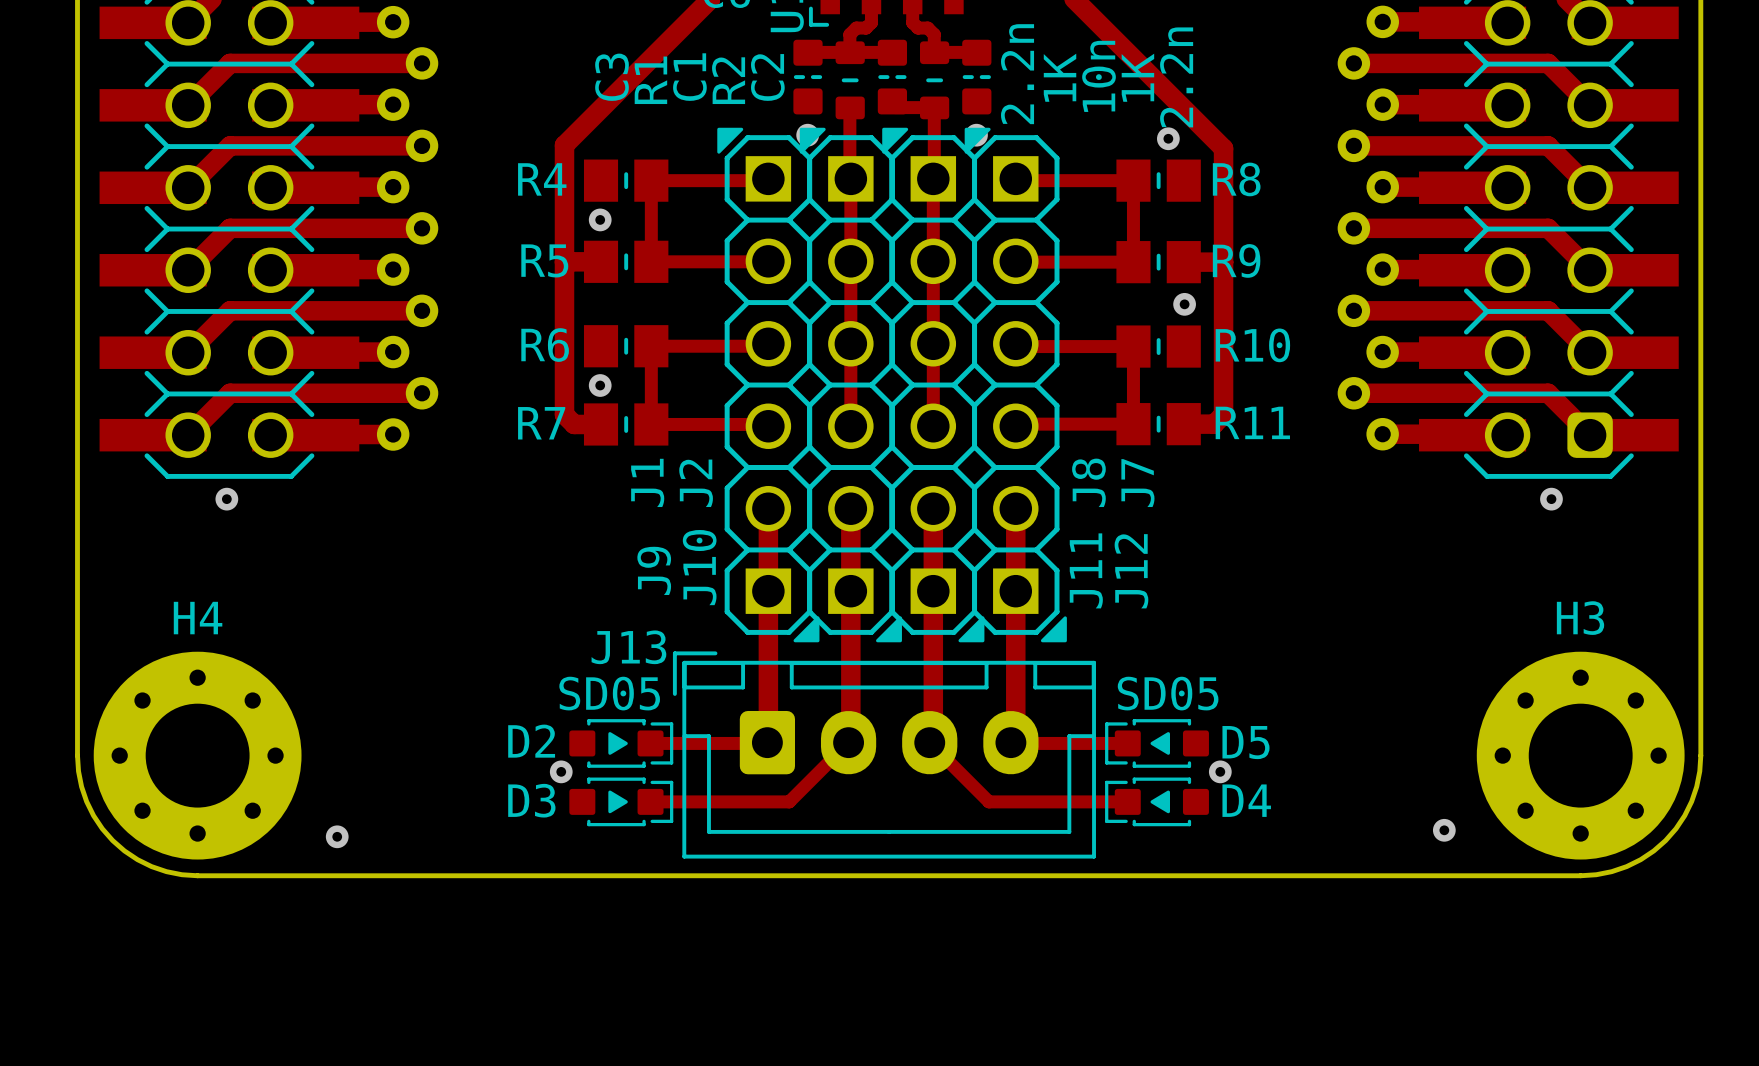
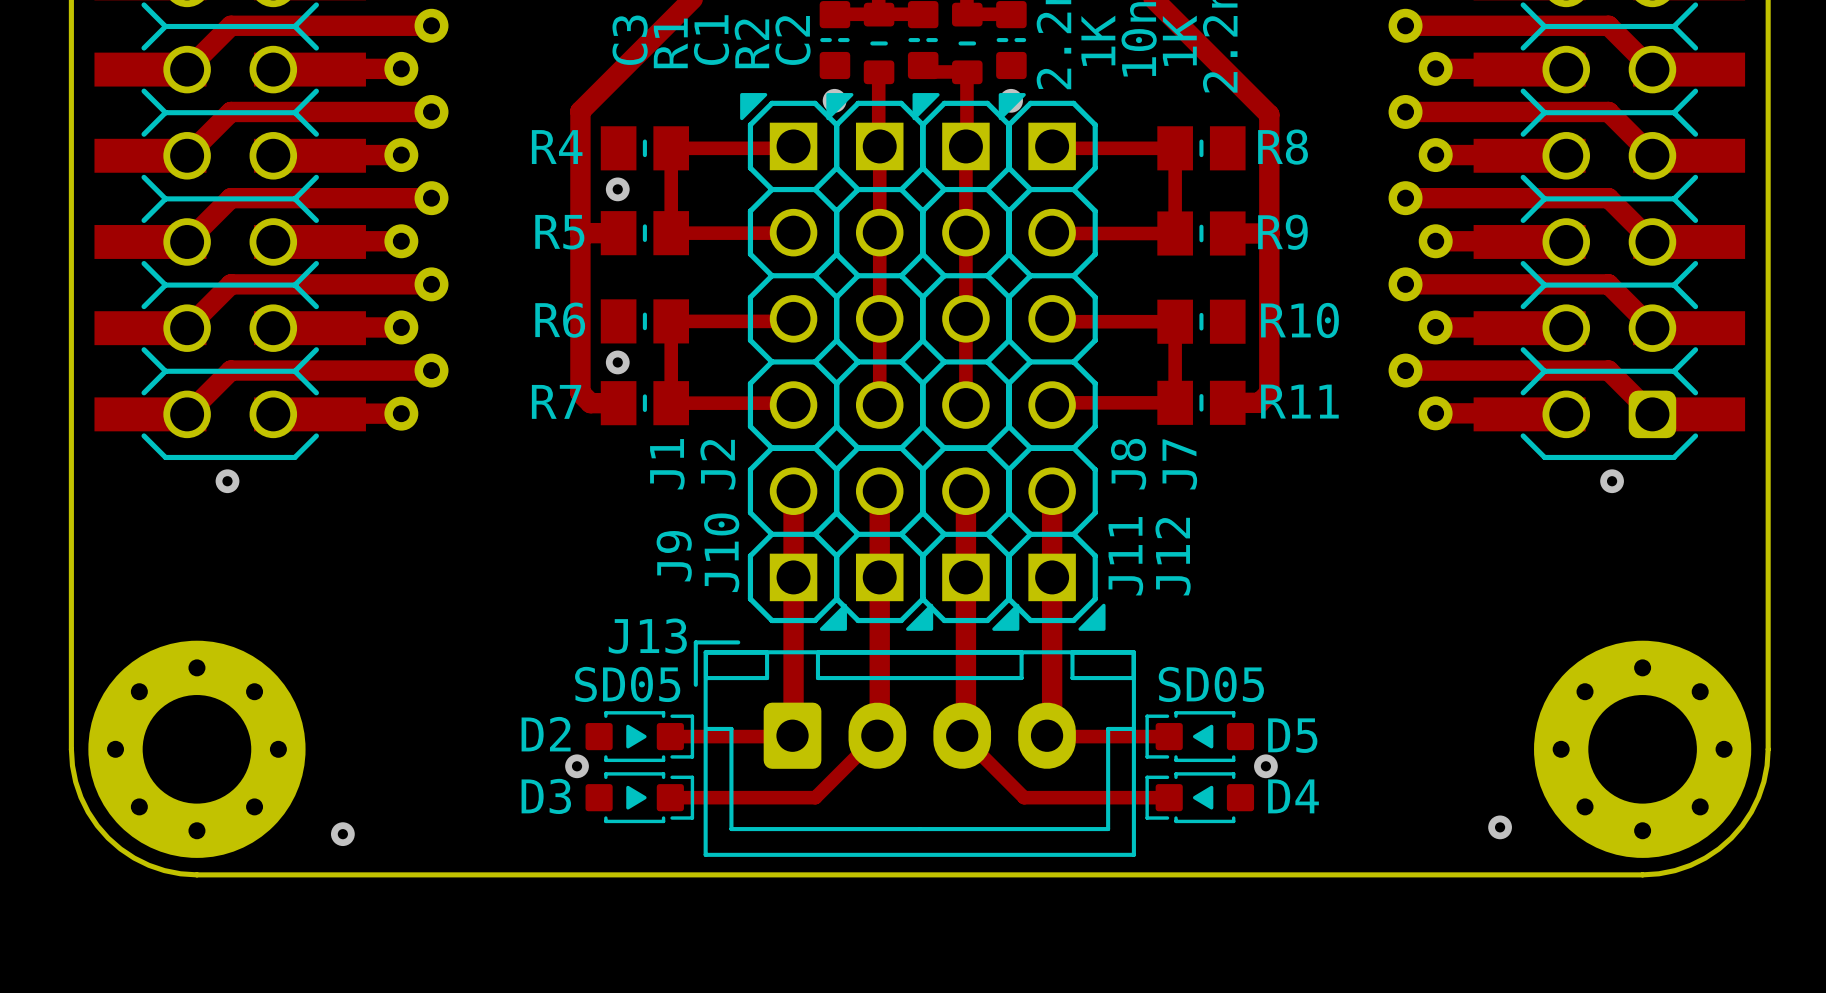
via: (1168, 138) -> none
via: (1184, 304) -> none
H4: (197, 755) -> none
H3: (1580, 755) -> none

